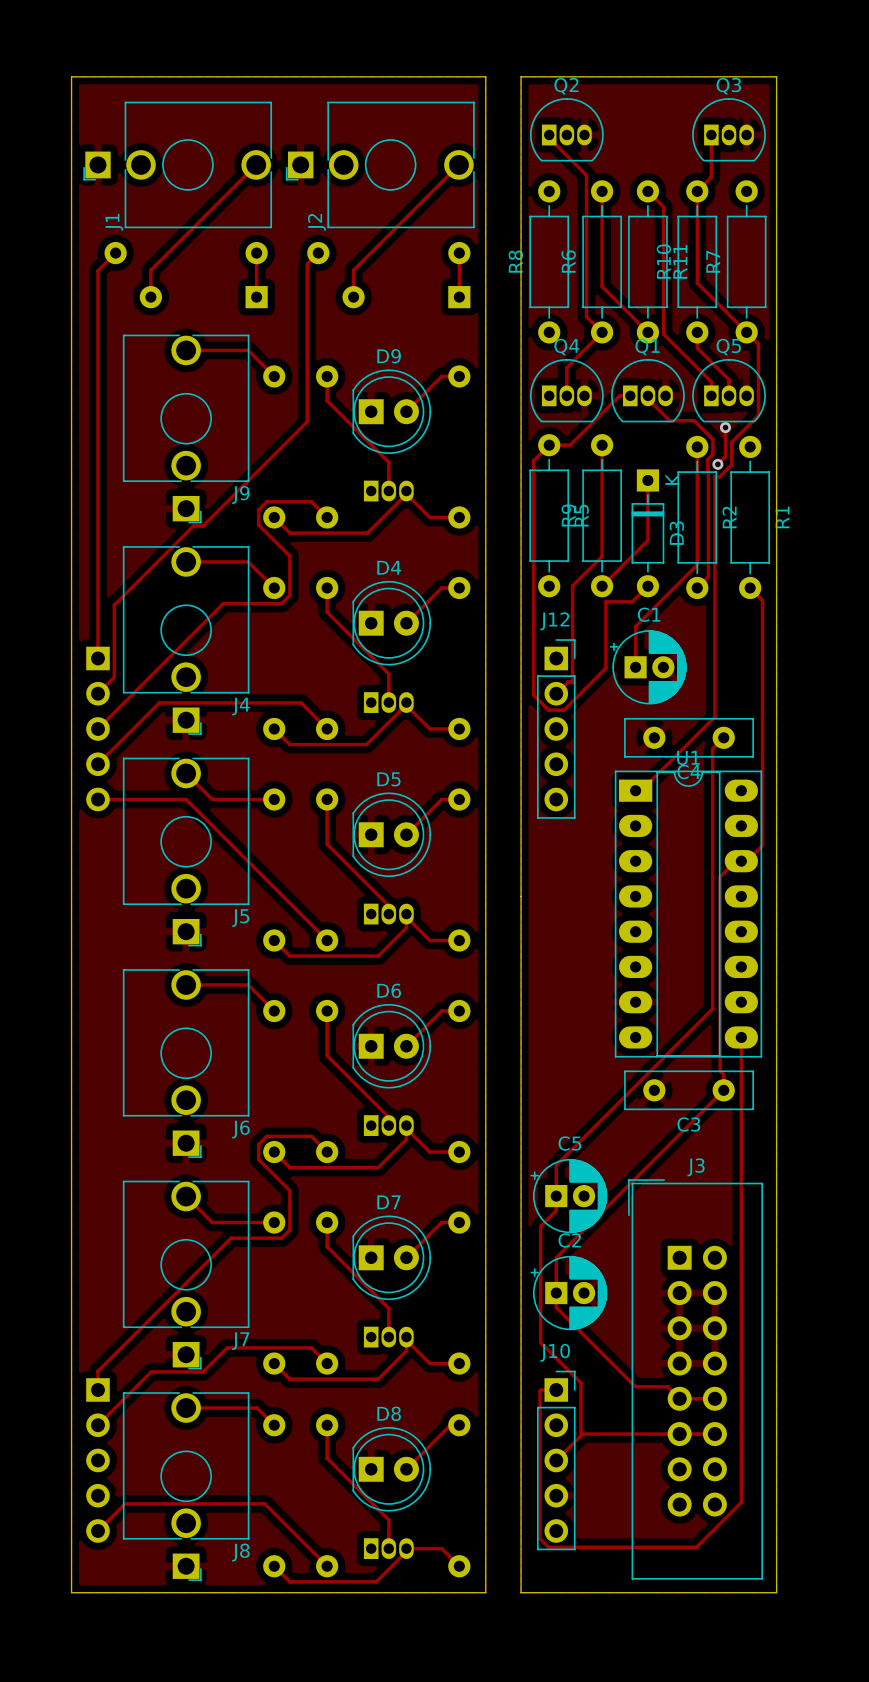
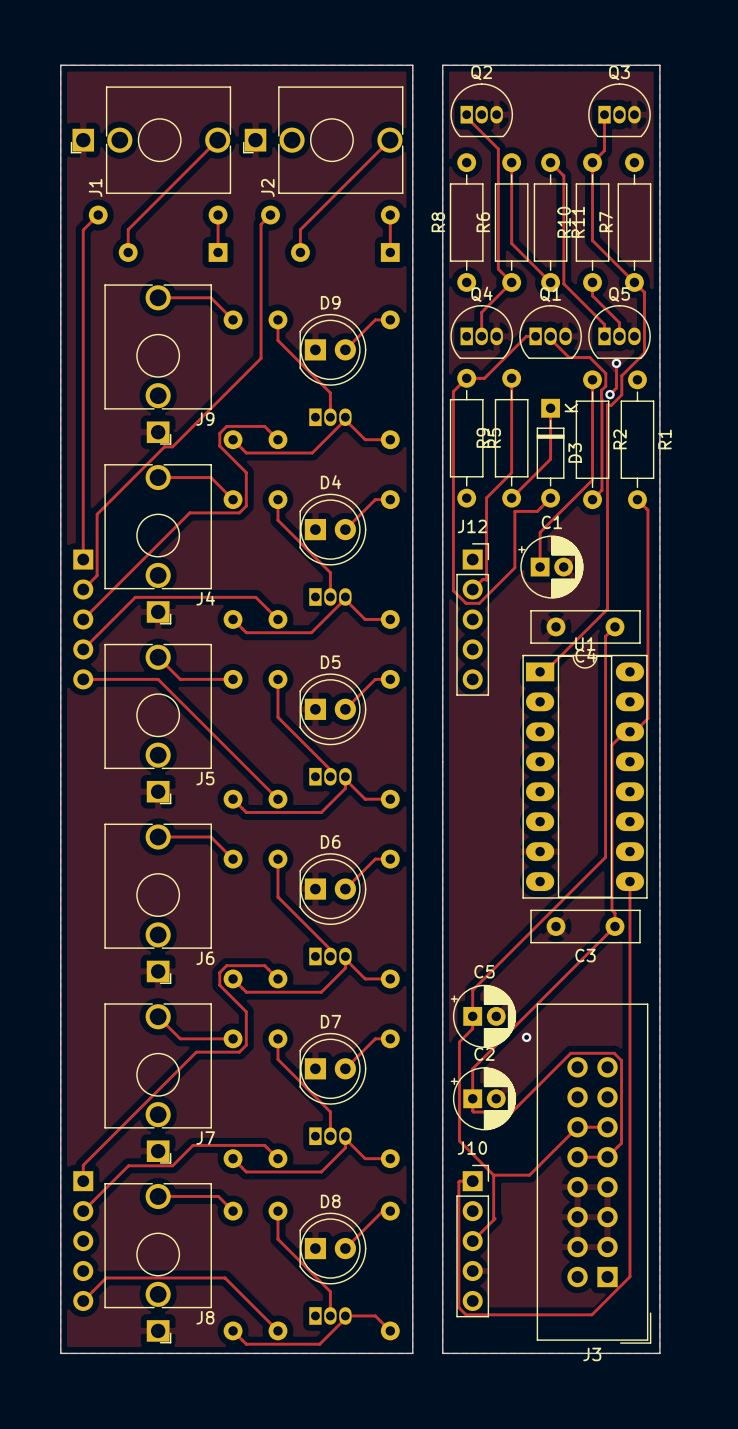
via: none -> (526, 1037)
track: (557, 1308) (635, 1386) (667, 1386) (679, 1398) (714, 1398) -> (473, 1112) (512, 1112) (570, 1053) (614, 1053) (621, 1060) (621, 1143) (607, 1157) (577, 1157)
track: none -> (607, 1127) (577, 1127) (529, 1175) (493, 1175)
J3 rotation: 0° (695, 1379) -> 180° (594, 1173)
track: (582, 1434) (714, 1434) -> none

